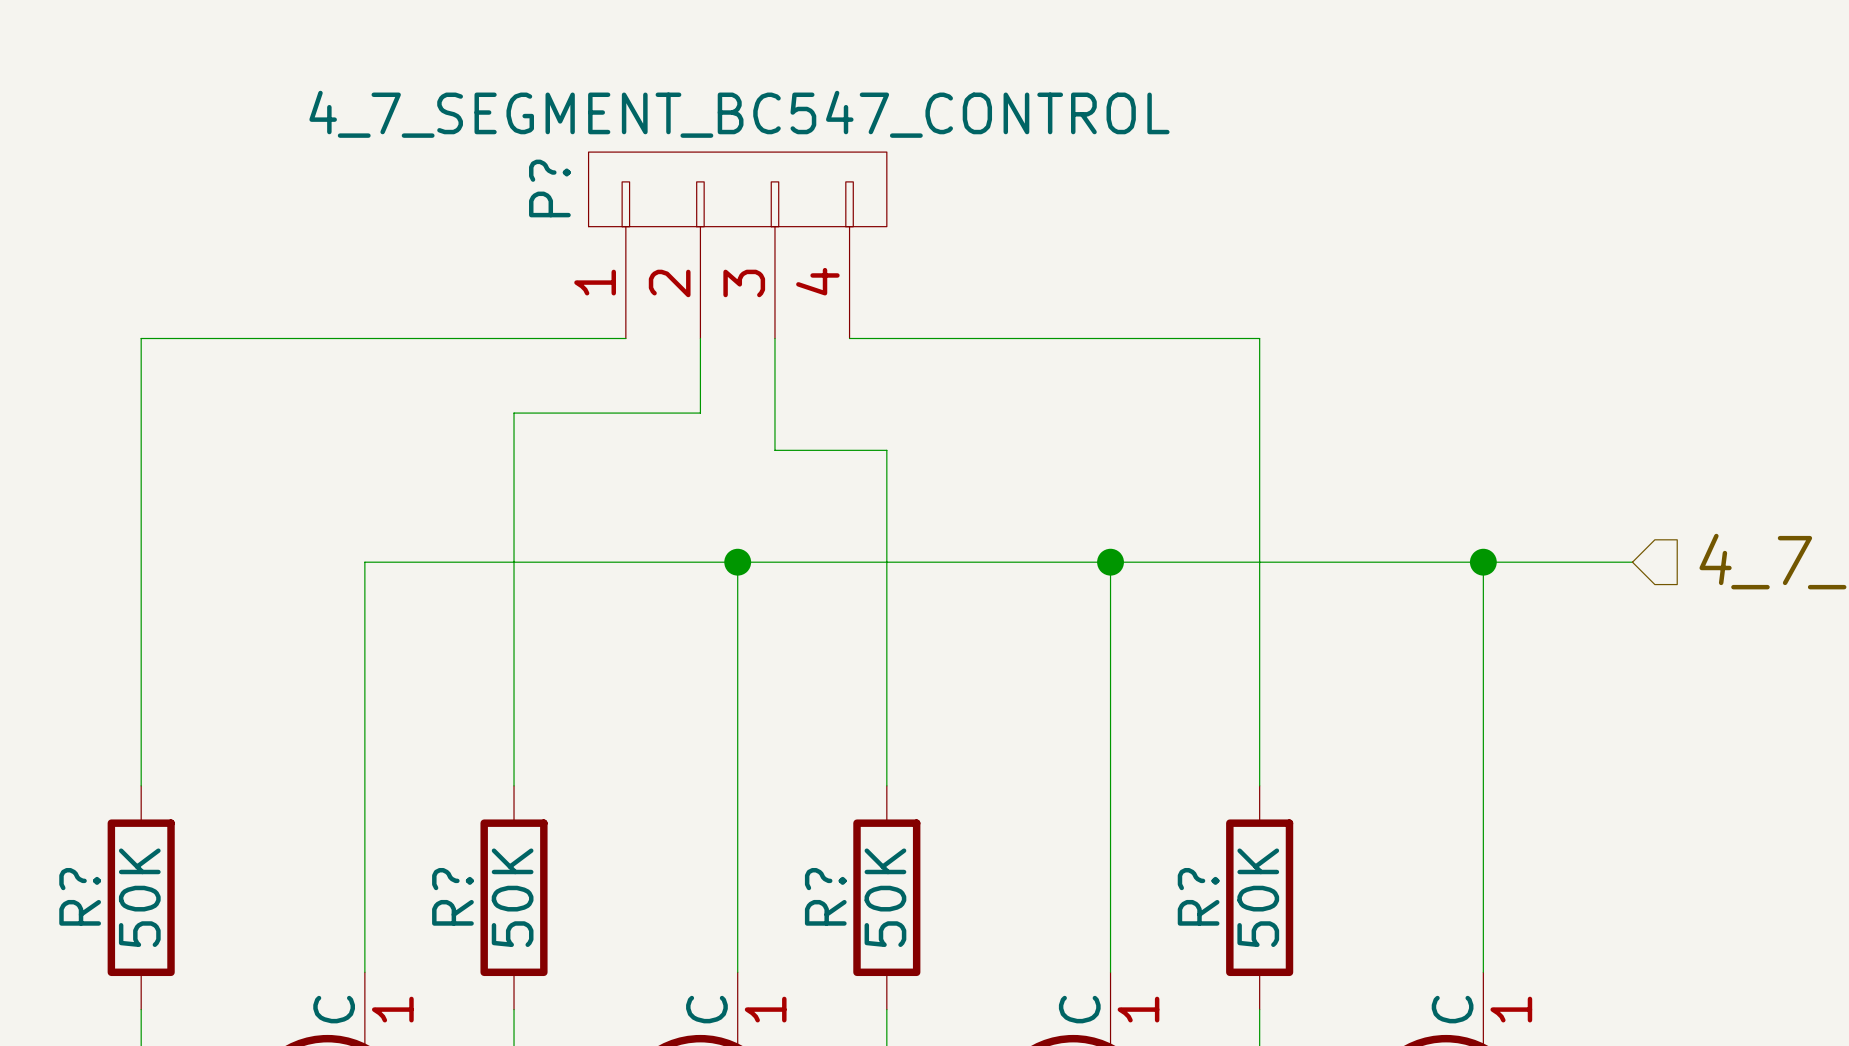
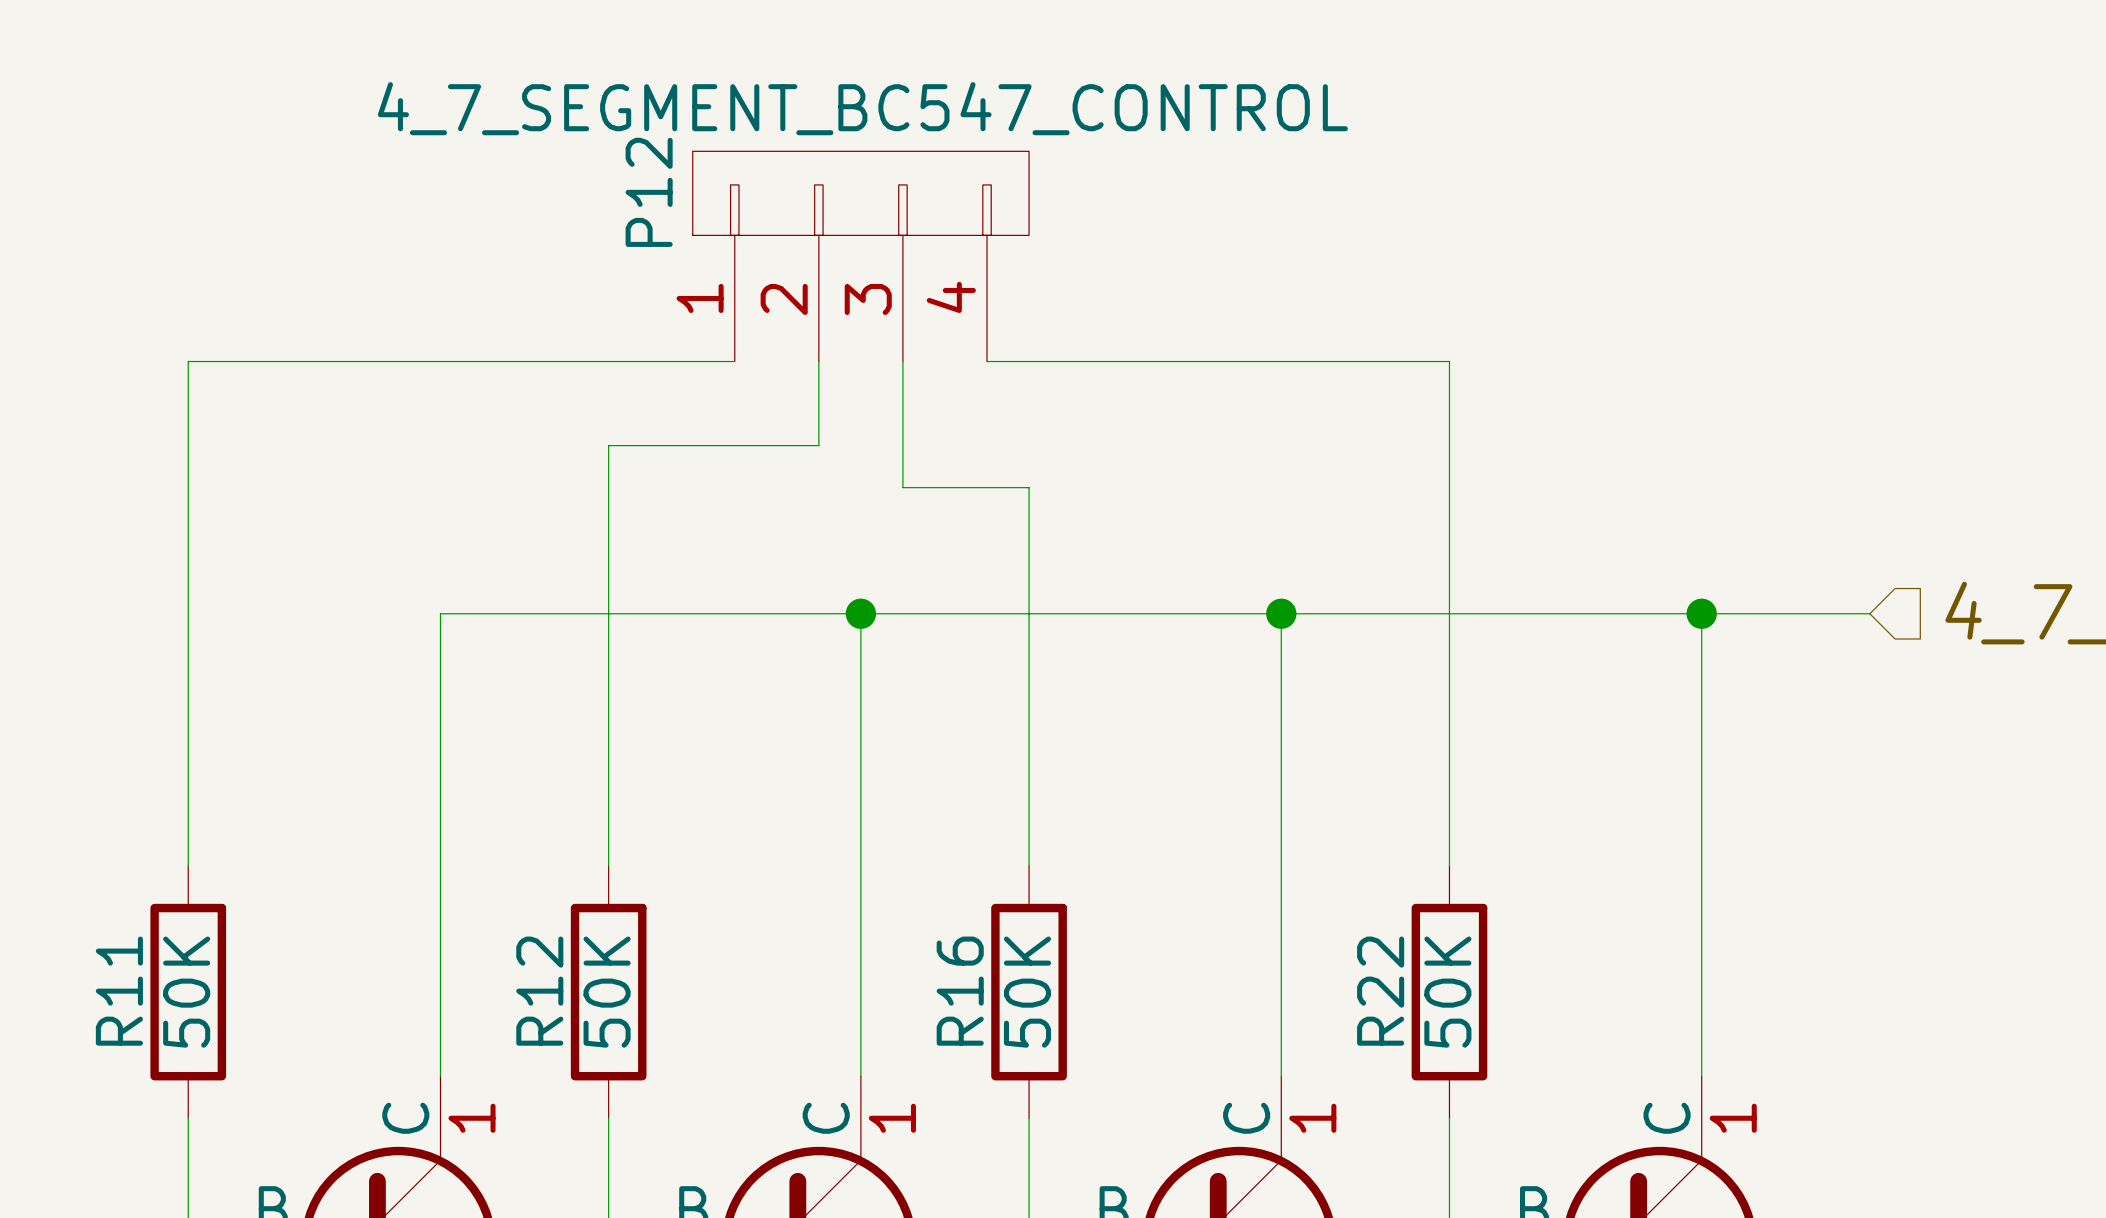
P? name: P? (549, 188) -> P12 (649, 192)
R? name: R? (80, 896) -> R11 (119, 991)
R? name: R? (452, 896) -> R12 (539, 991)
R? name: R? (825, 896) -> R16 (960, 991)
R? name: R? (1198, 896) -> R22 (1380, 991)

